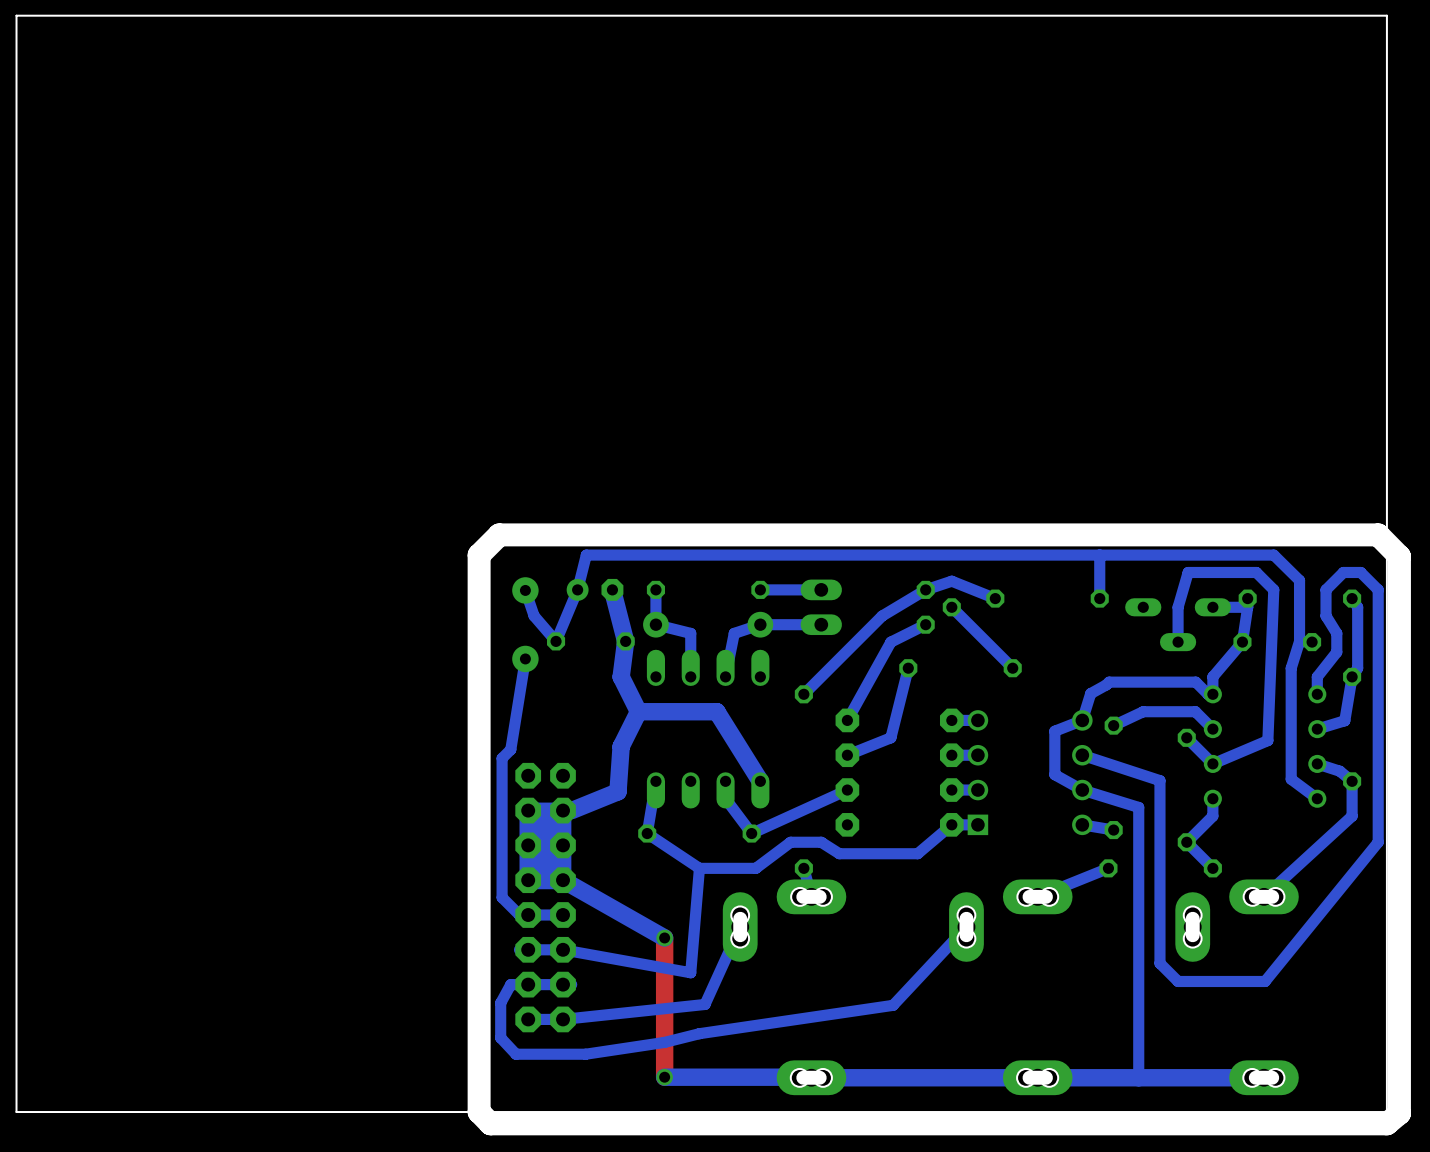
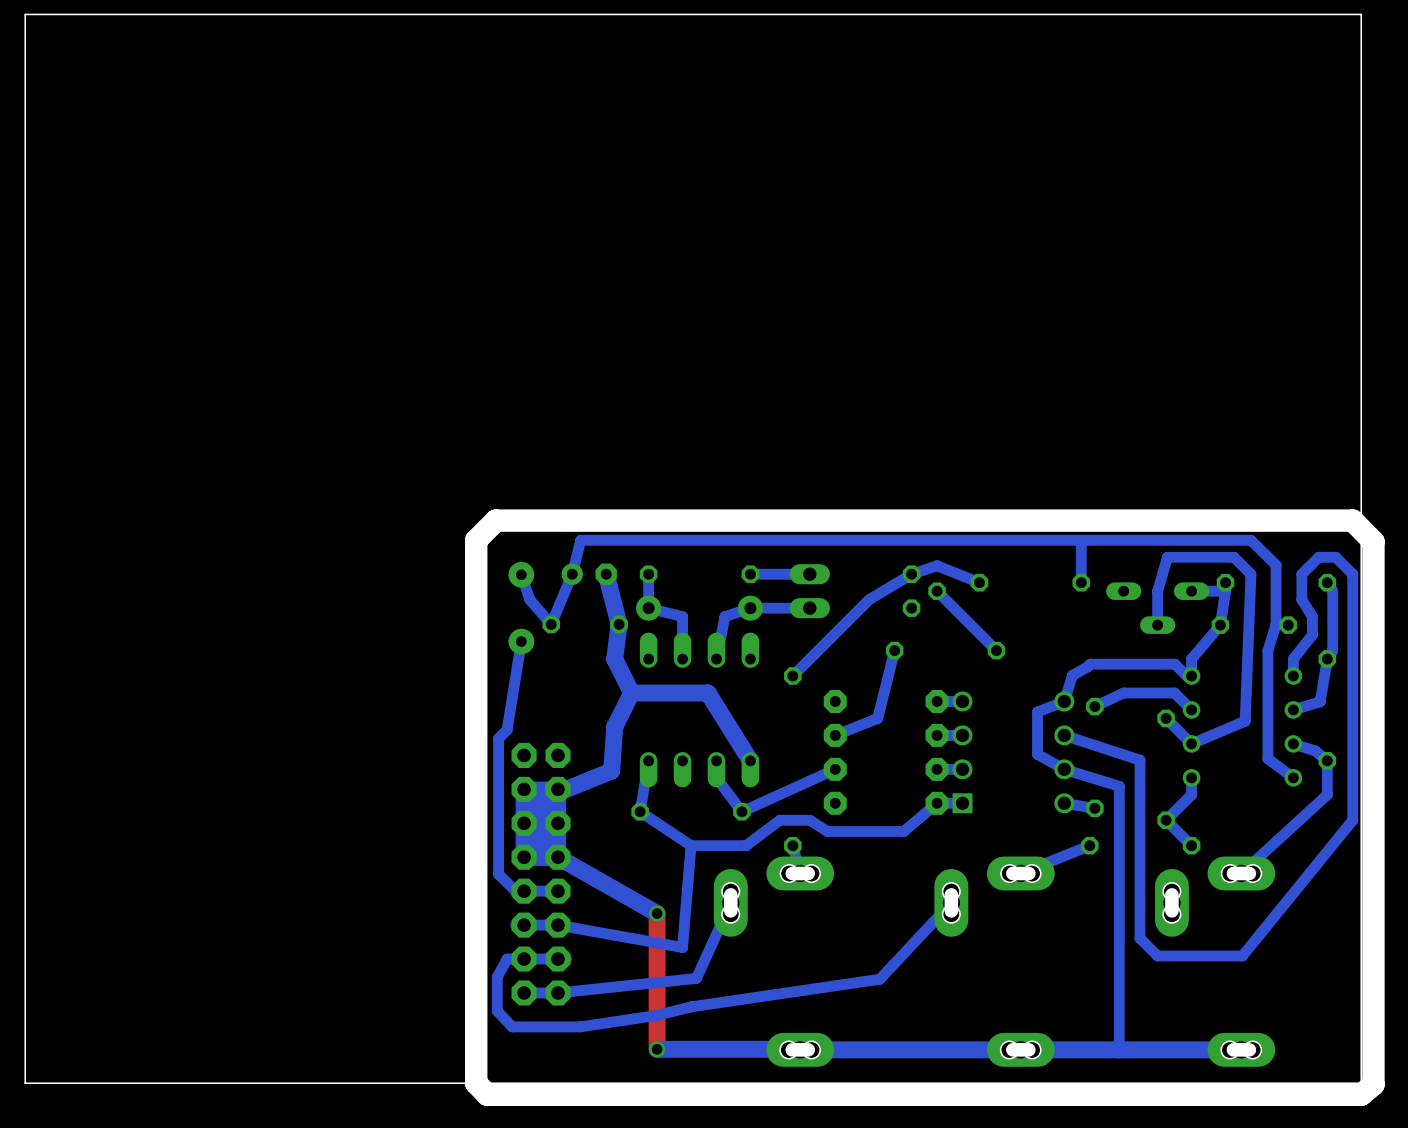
bottom track: (925, 624) (890, 642) (847, 720) -> none

